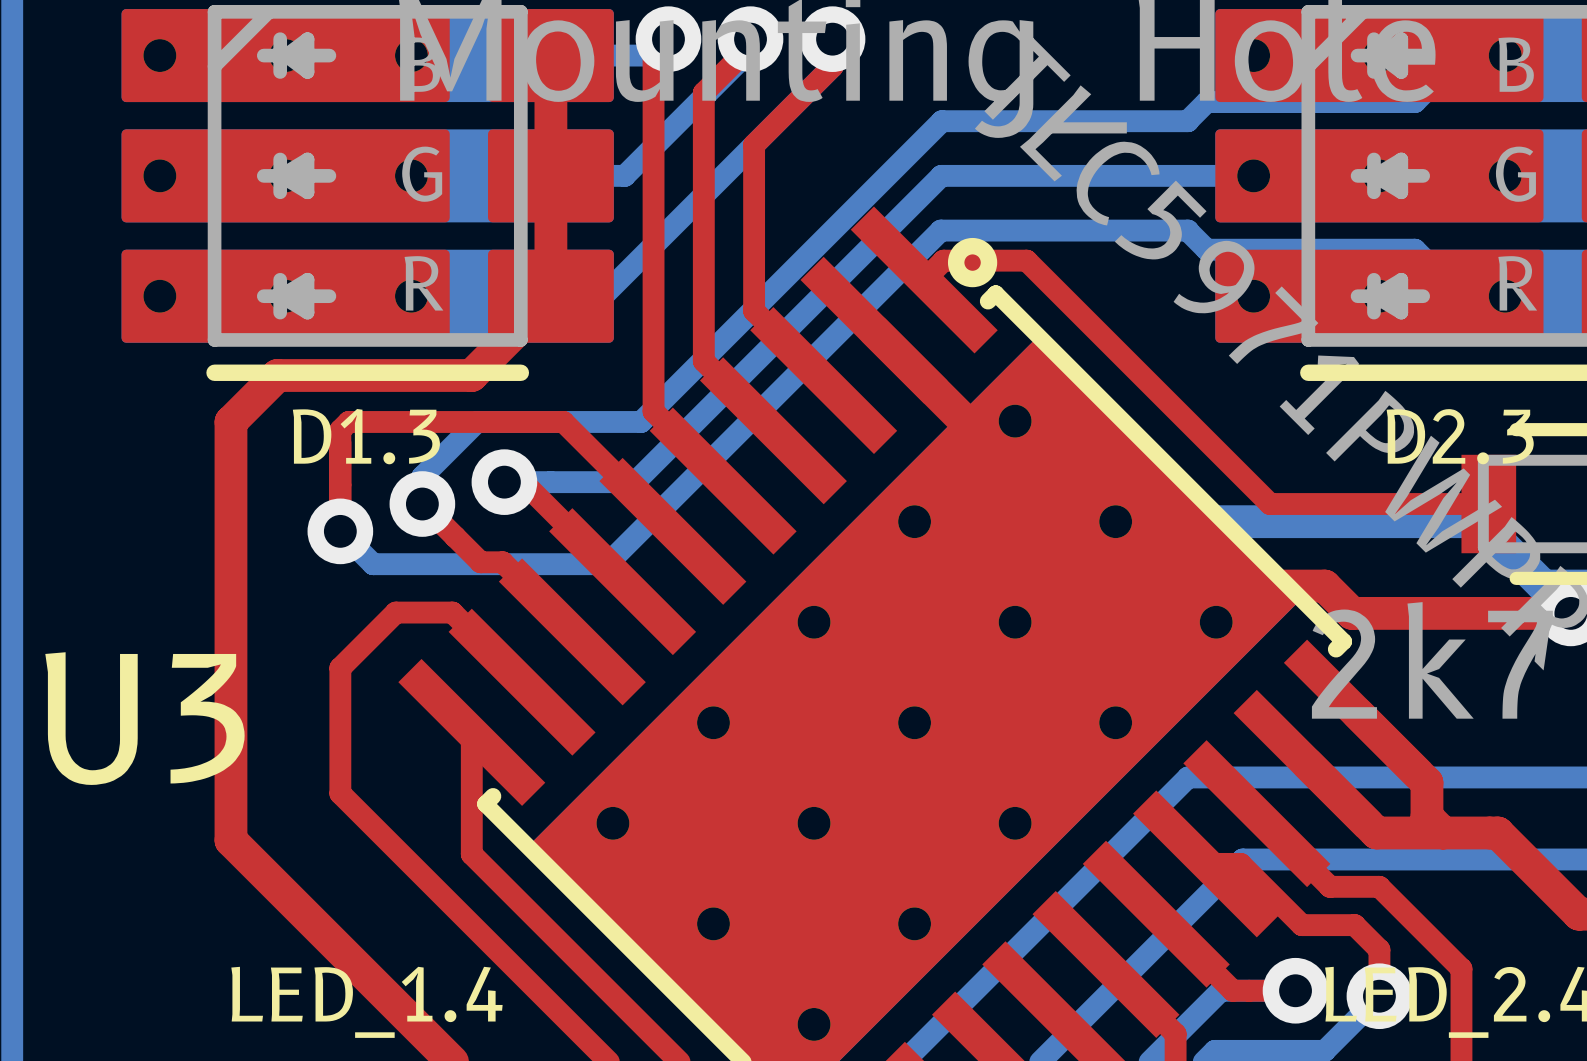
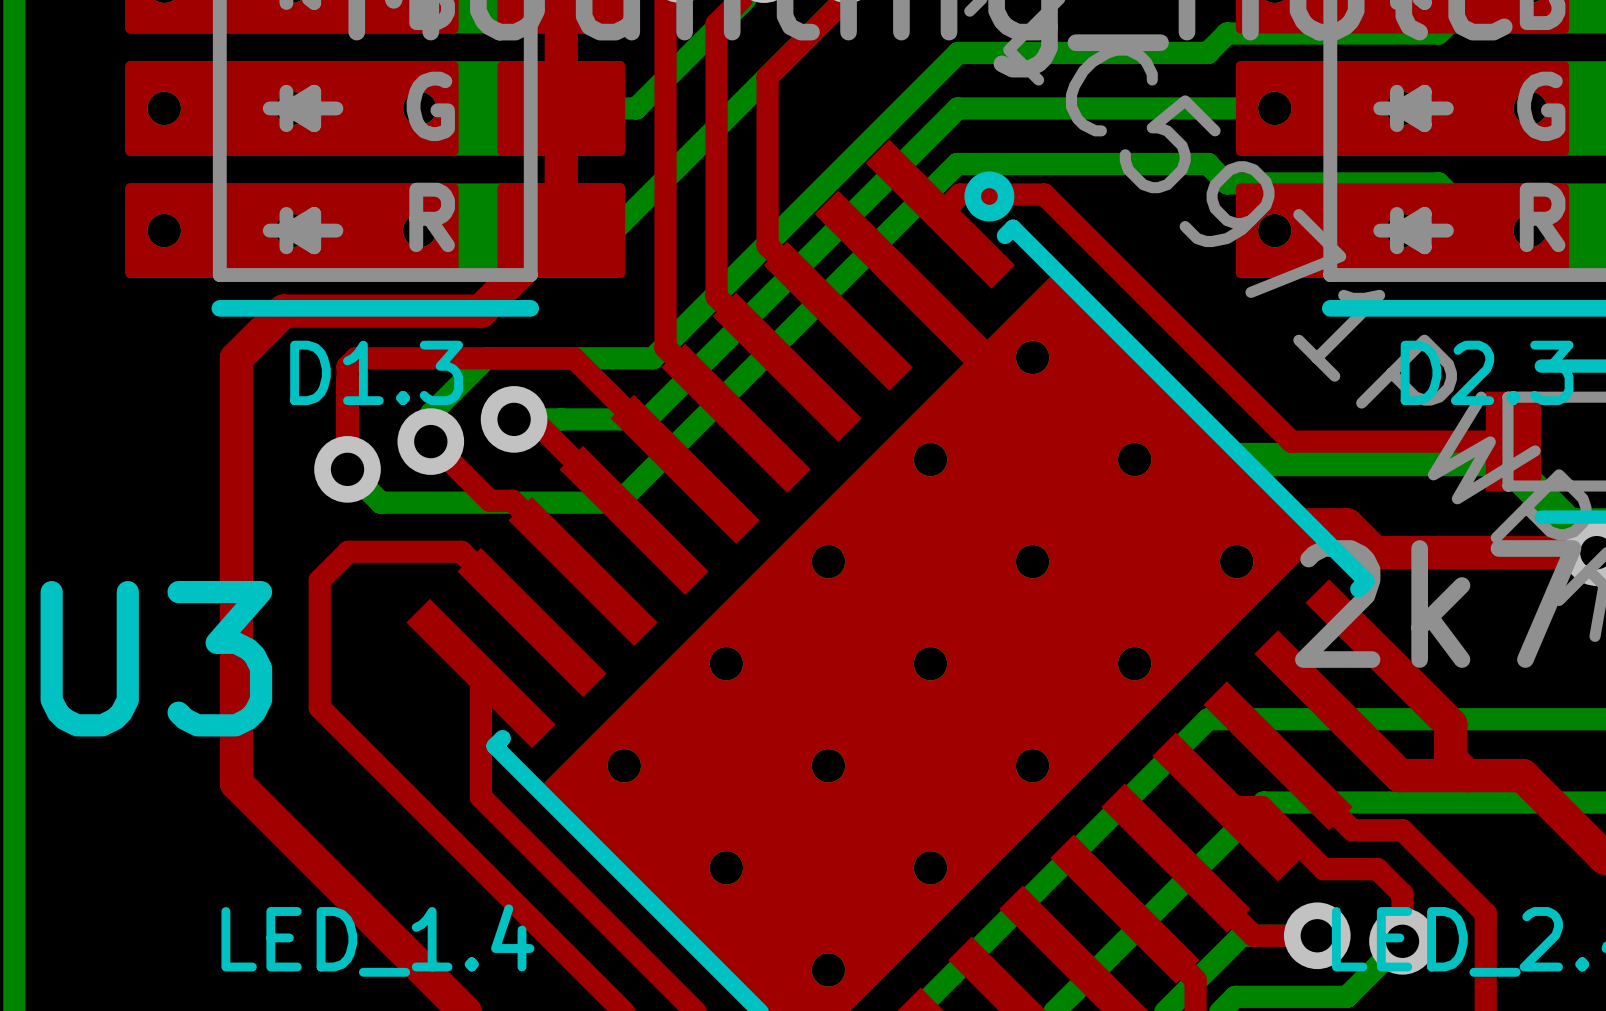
top track: (395, 612) (340, 668) (340, 793) -> (403, 551) (348, 551) (319, 580) (319, 707) (347, 735)

